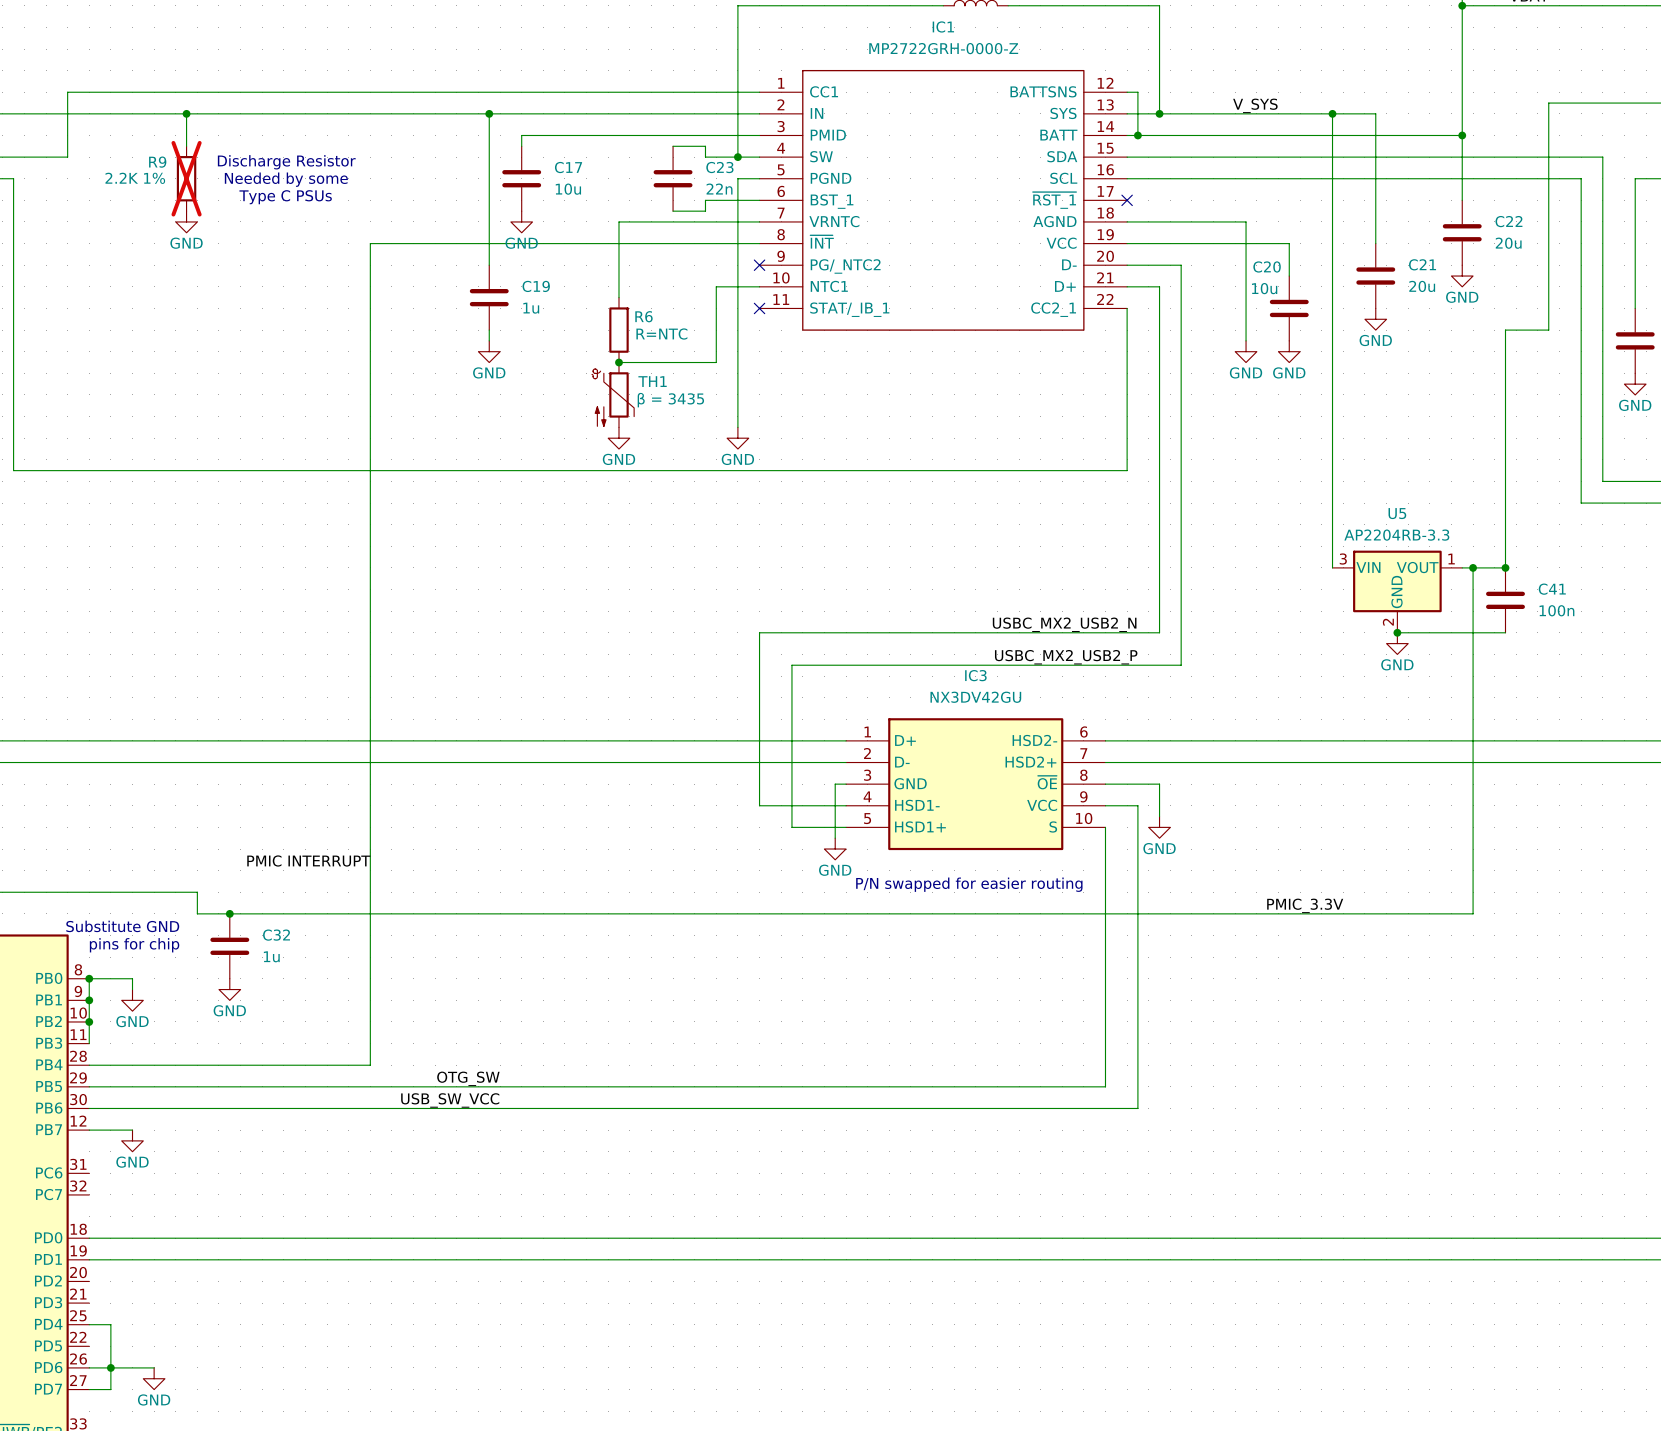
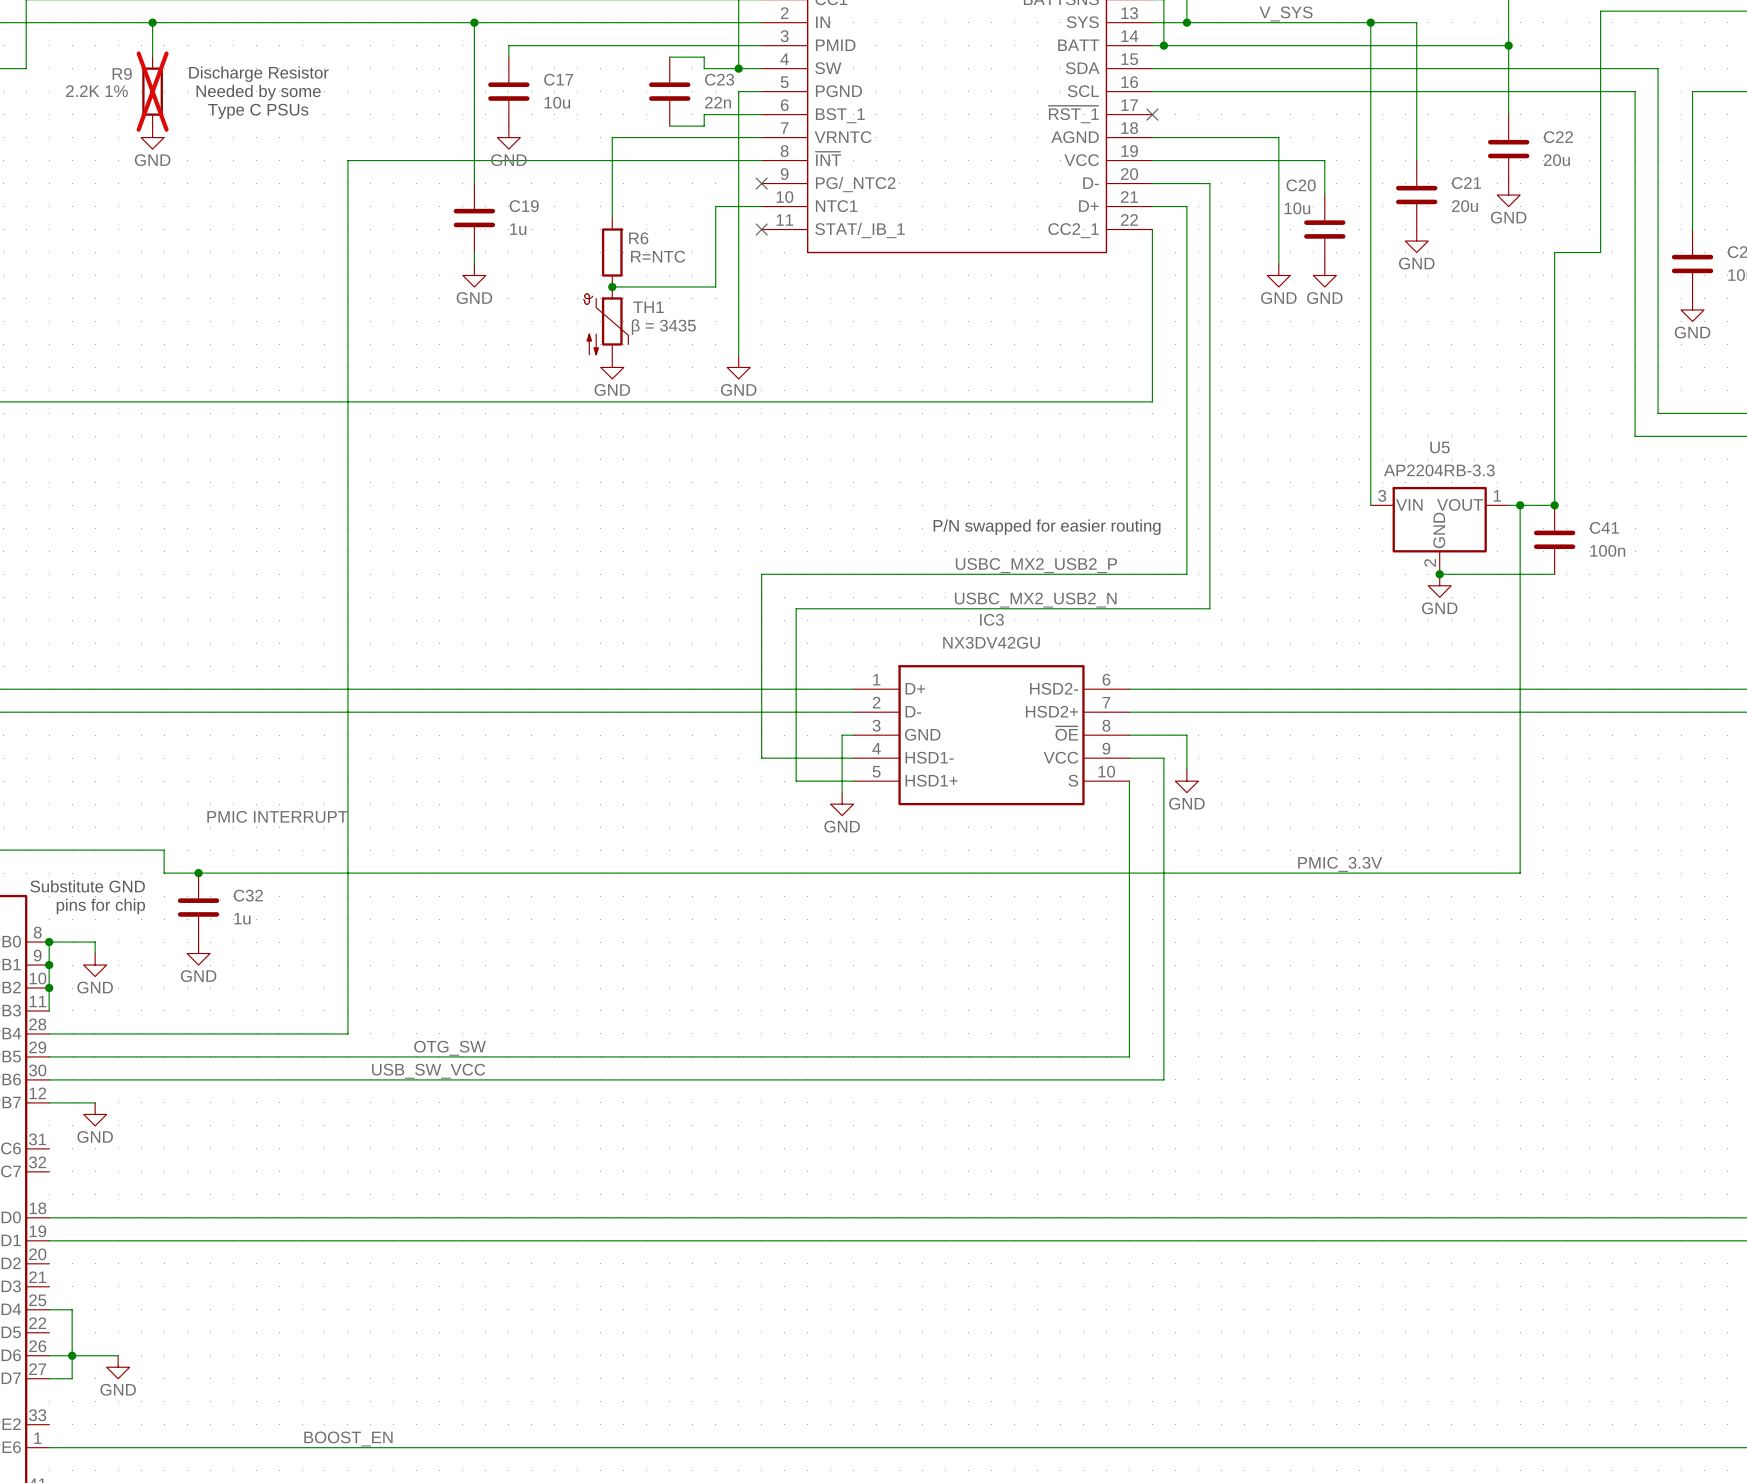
text: none -> P/N swapped for easier routing (1047, 527)
label position: USBC_MX2_USB2_N (1064, 624) -> USBC_MX2_USB2_N (1035, 600)
label position: USBC_MX2_USB2_P (1066, 657) -> USBC_MX2_USB2_P (1036, 565)
text: P/N swapped for easier routing (969, 884) -> none

